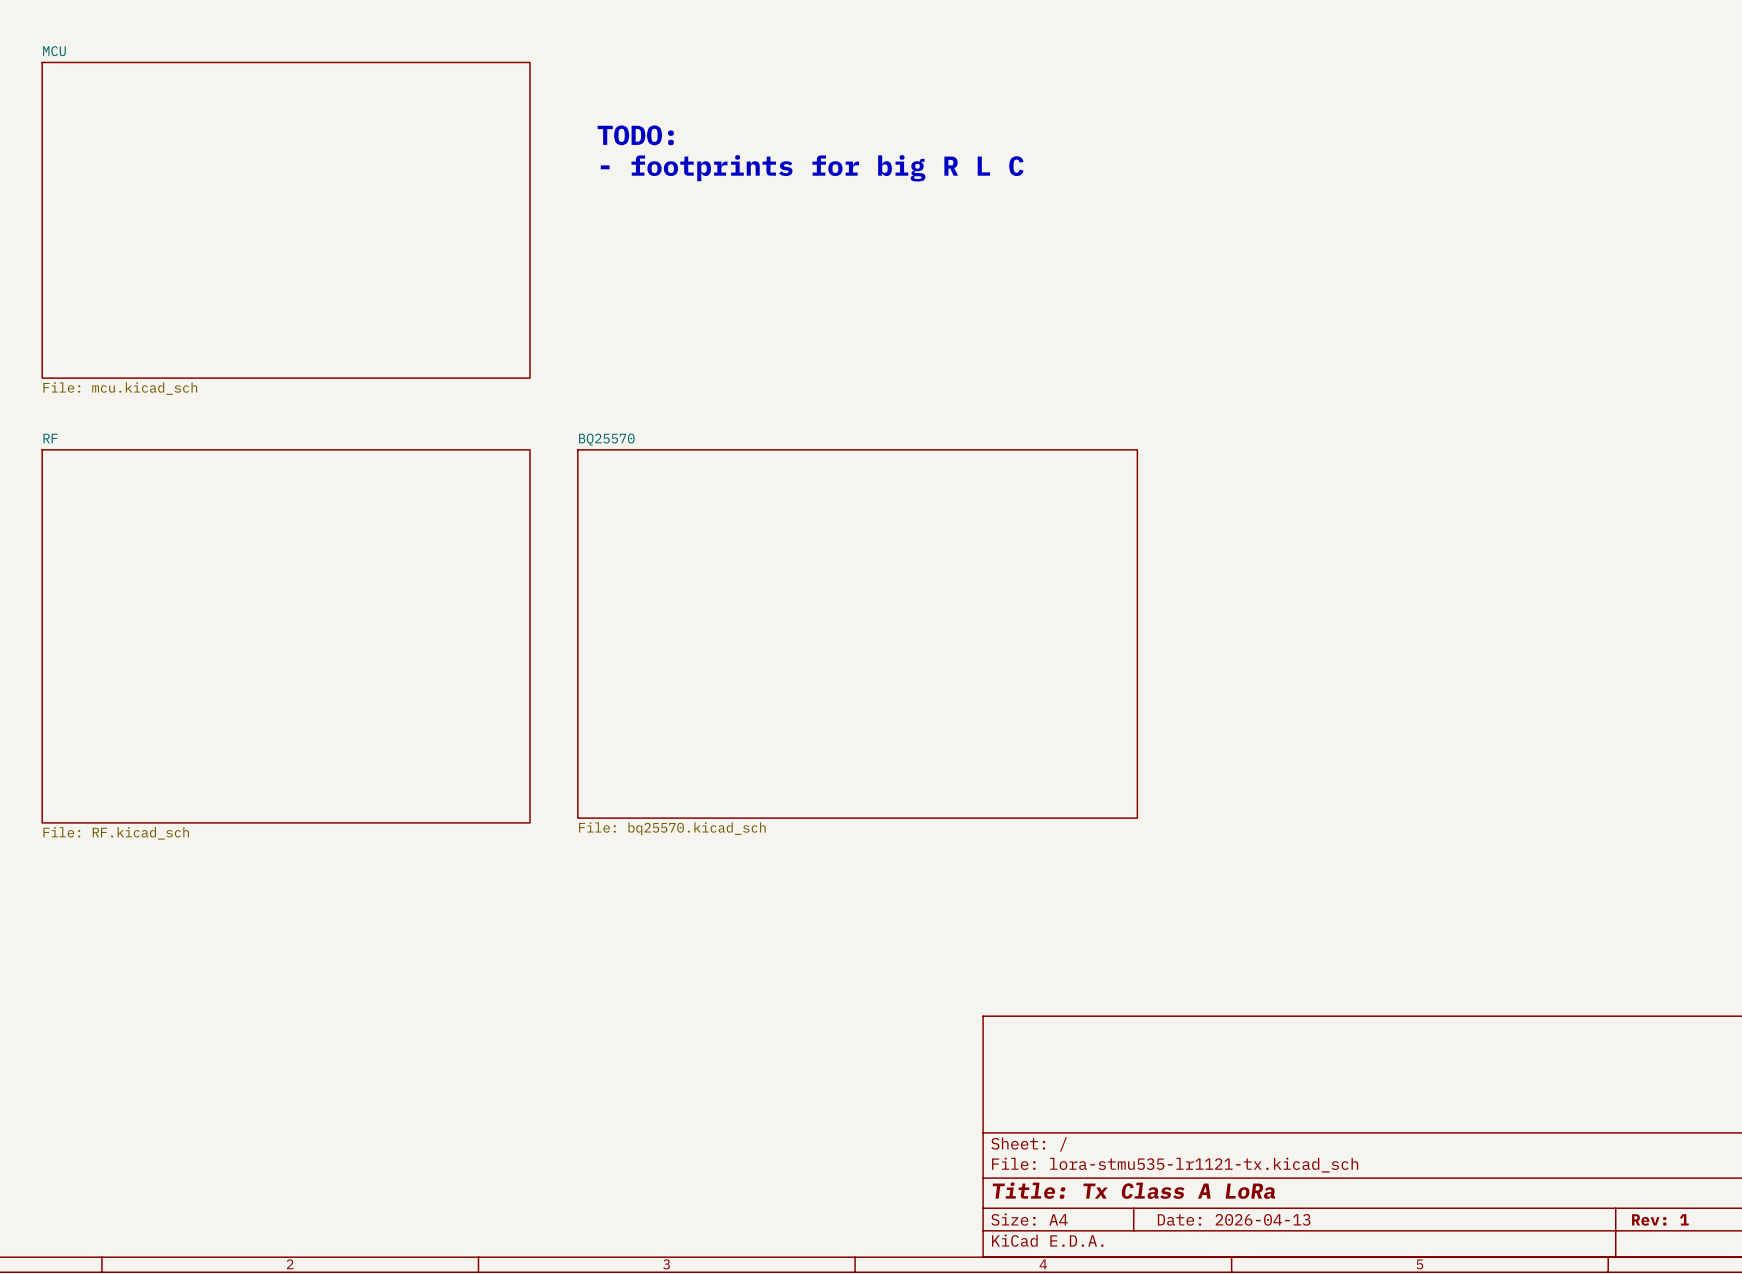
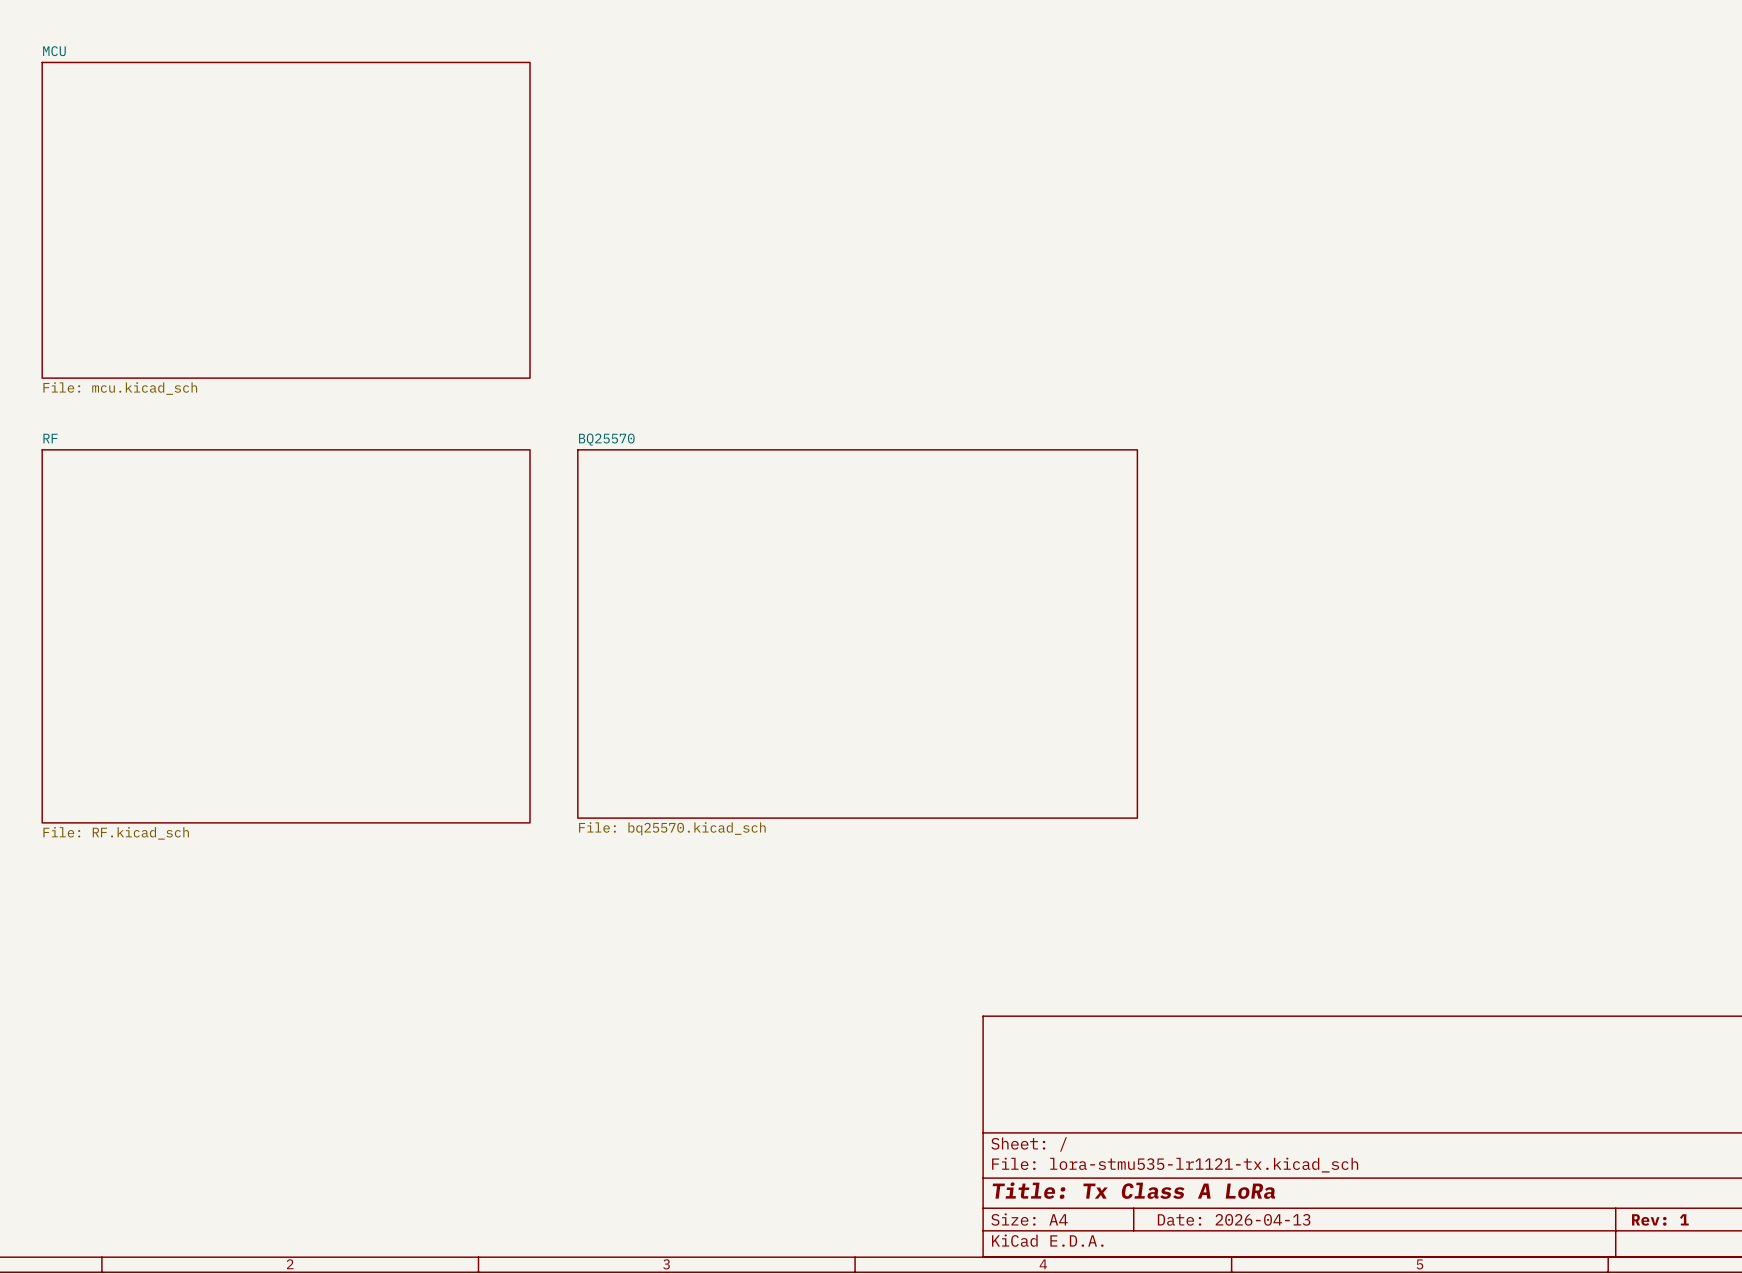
text: TODO: (635, 135) -> none
text: - footprints for big R L C (812, 168) -> none

